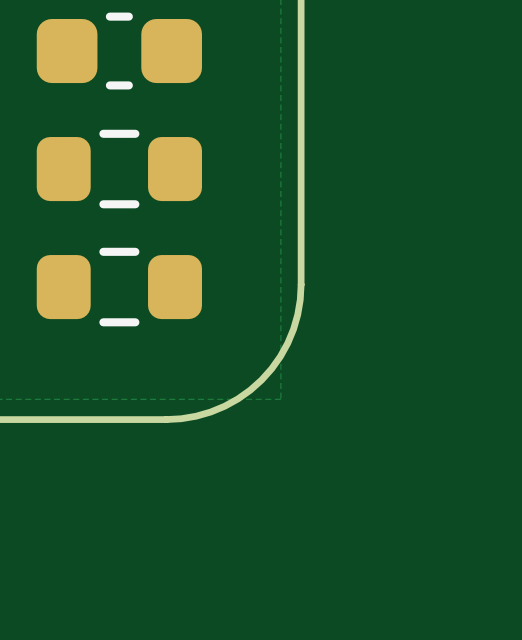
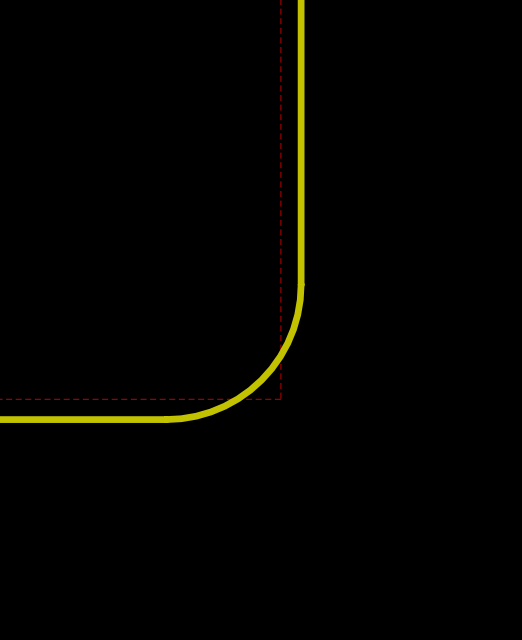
part: (119, 51) -> none
part: (119, 169) -> none
part: (119, 287) -> none

